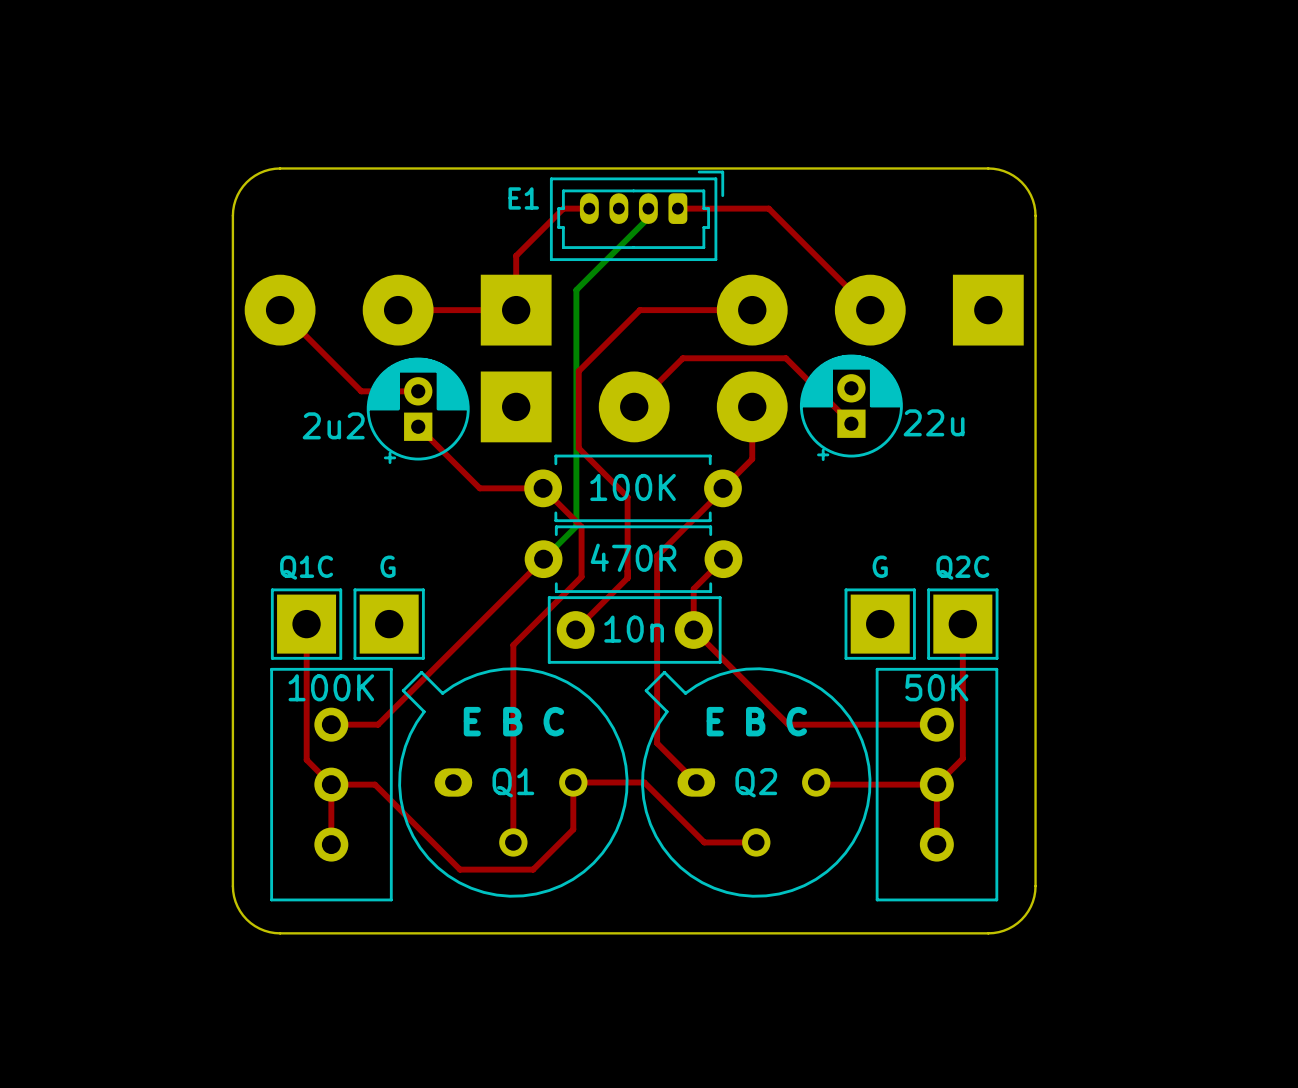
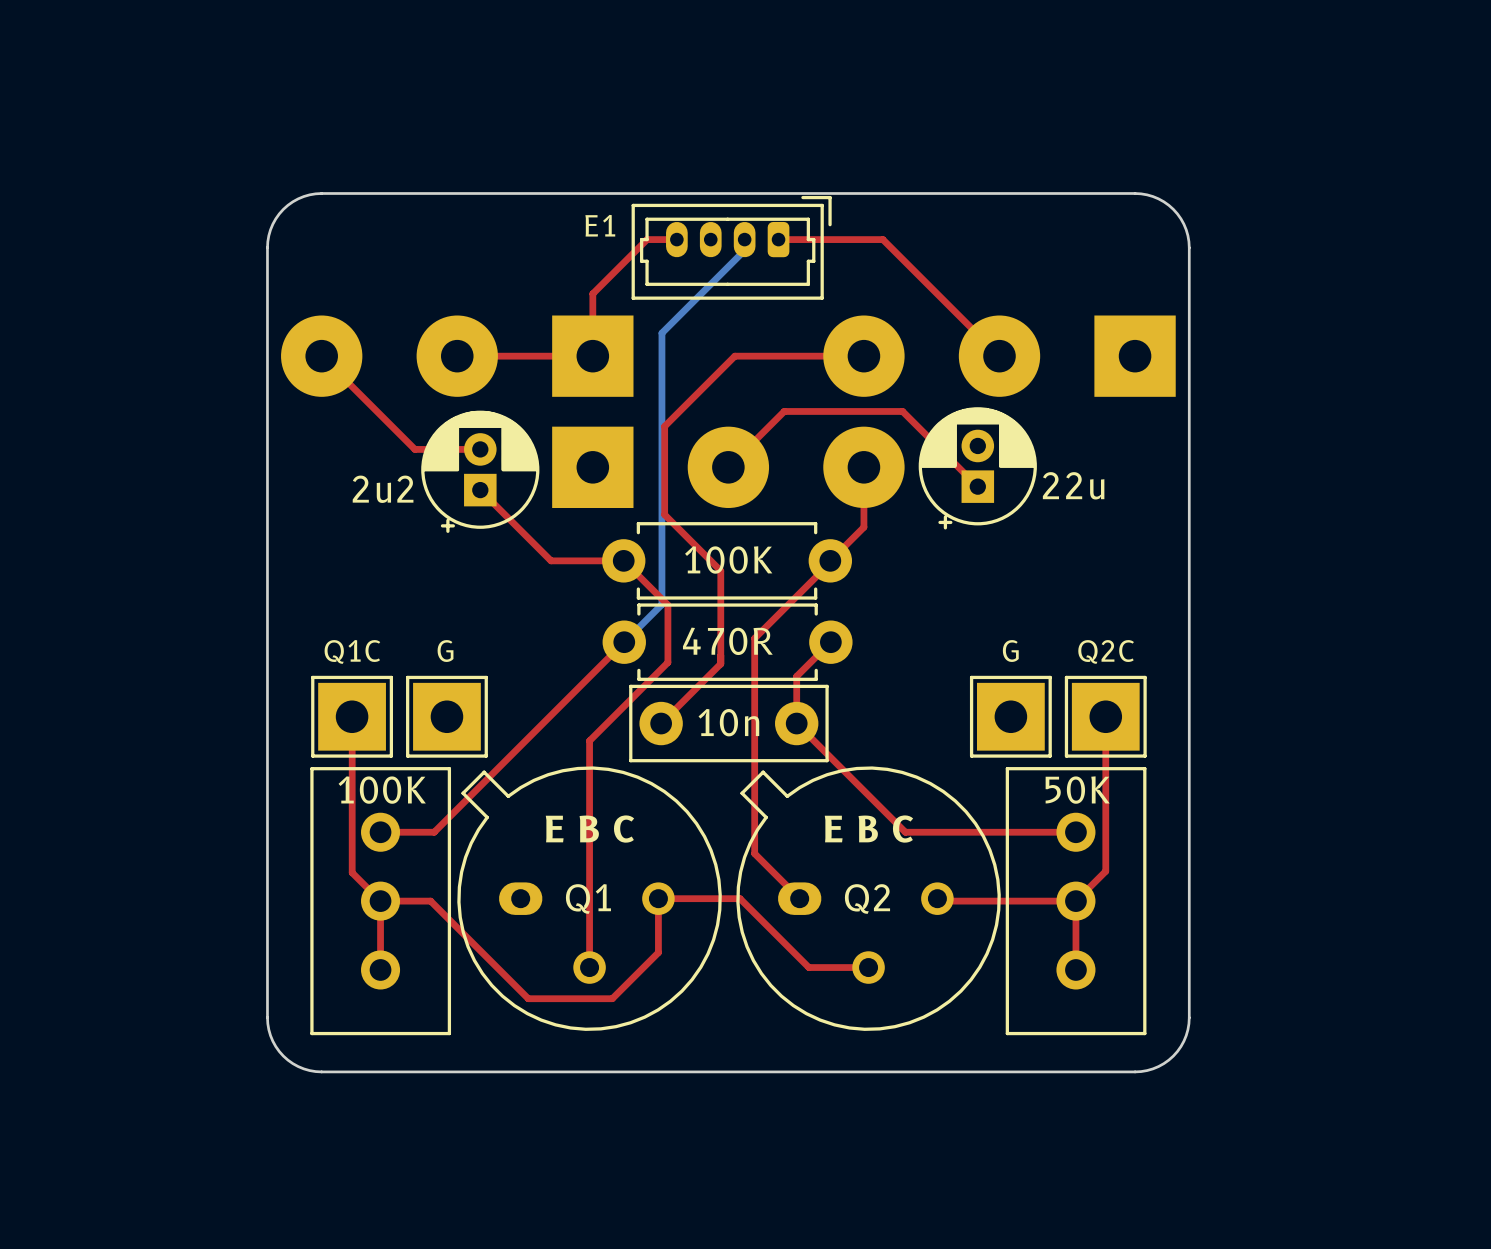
part text: none -> E1 (600, 225)
part value: E1 (523, 198) -> none

